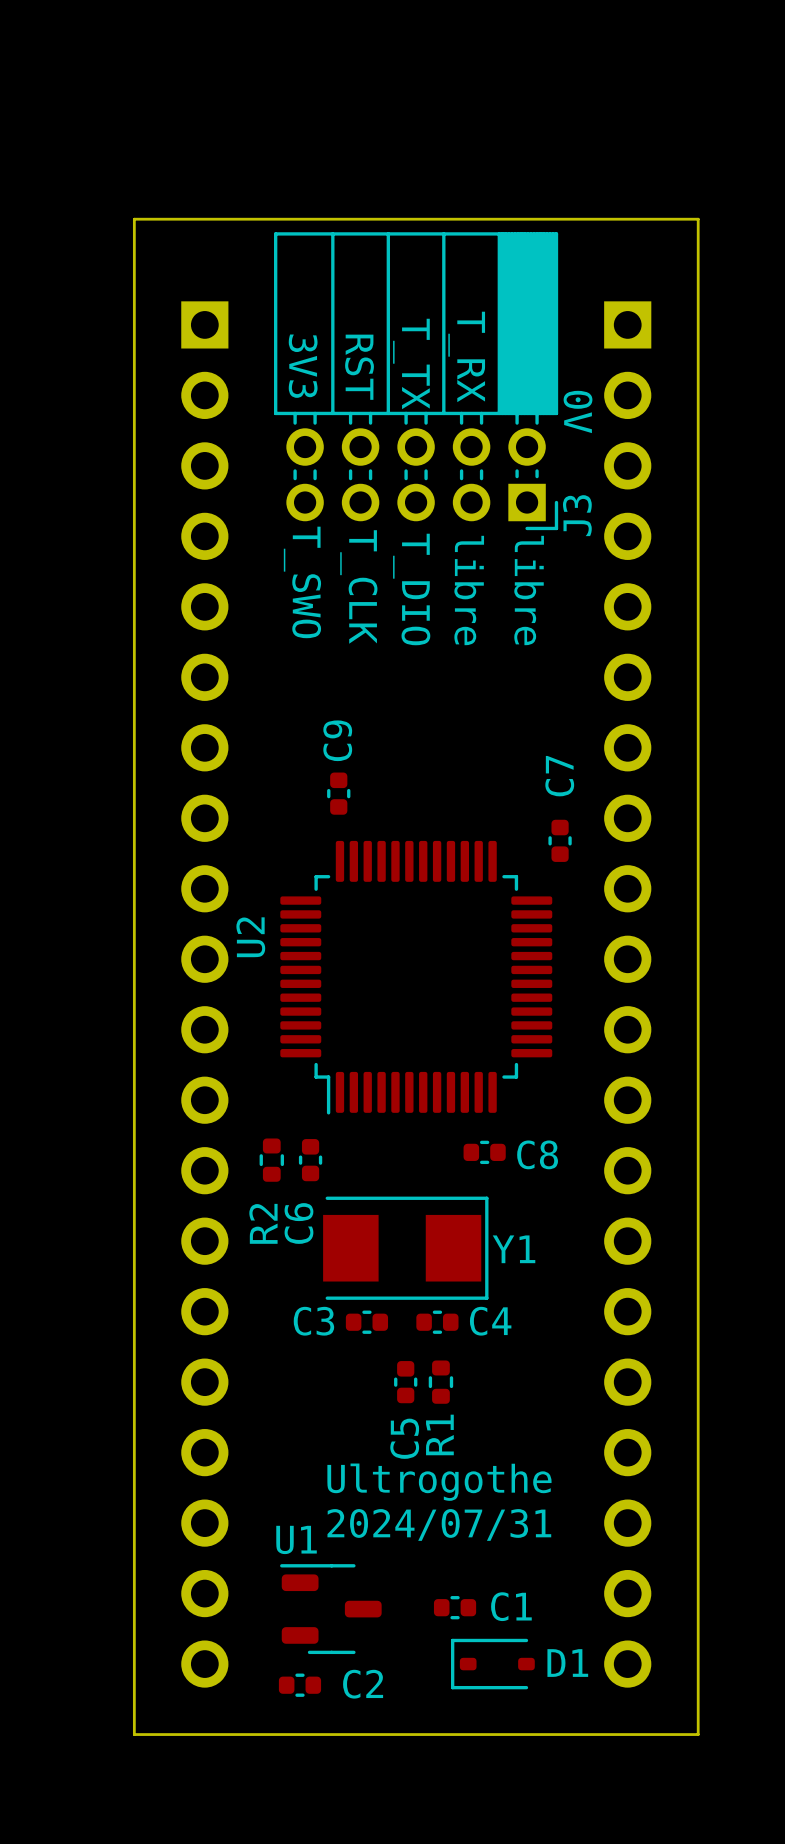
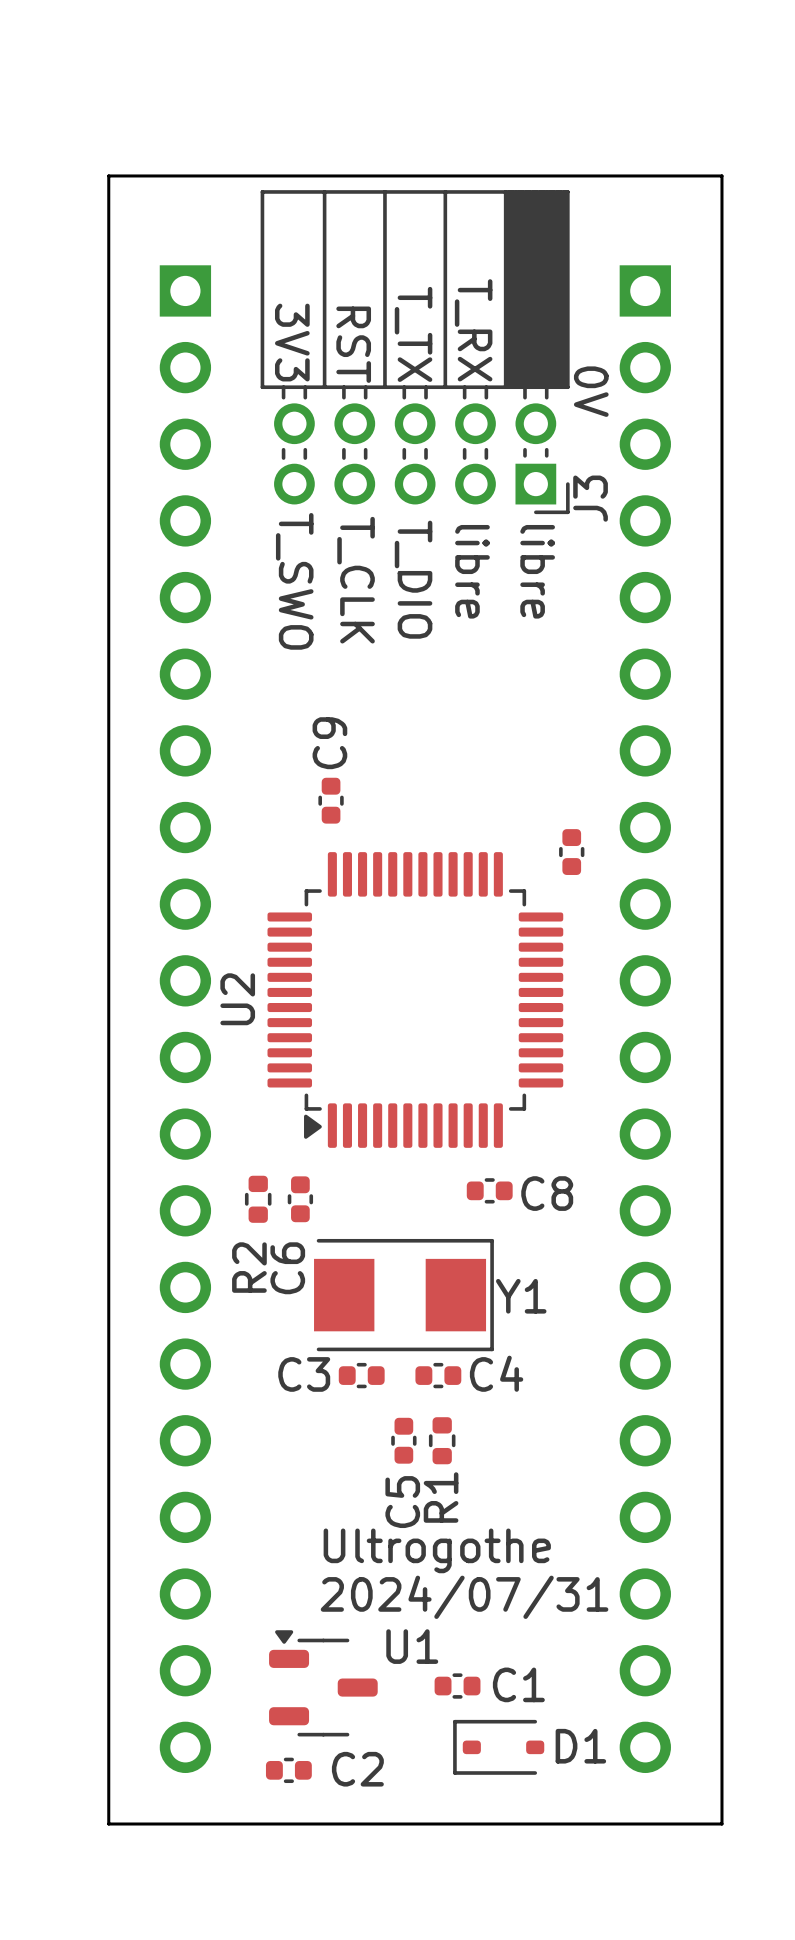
C7 name: C7 (559, 776) -> none
U2 footprint: [280, 840, 553, 1115] -> [267, 852, 564, 1148]
U2 name position: U2 (250, 937) -> U2 (237, 999)
U1 name position: U1 (296, 1539) -> U1 (412, 1646)
U1 footprint: [280, 1564, 382, 1655] -> [269, 1630, 378, 1737]

